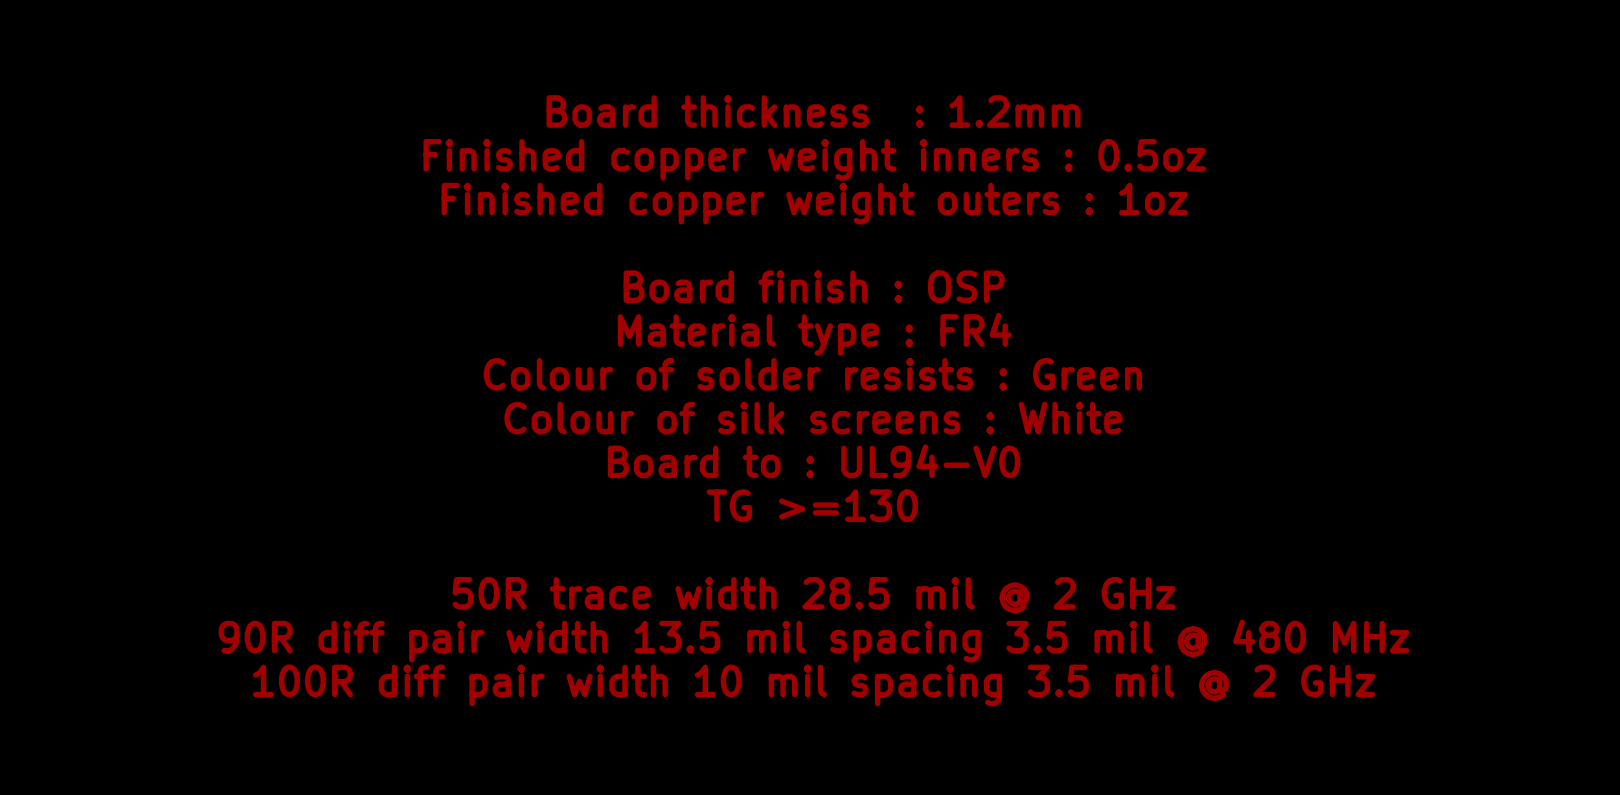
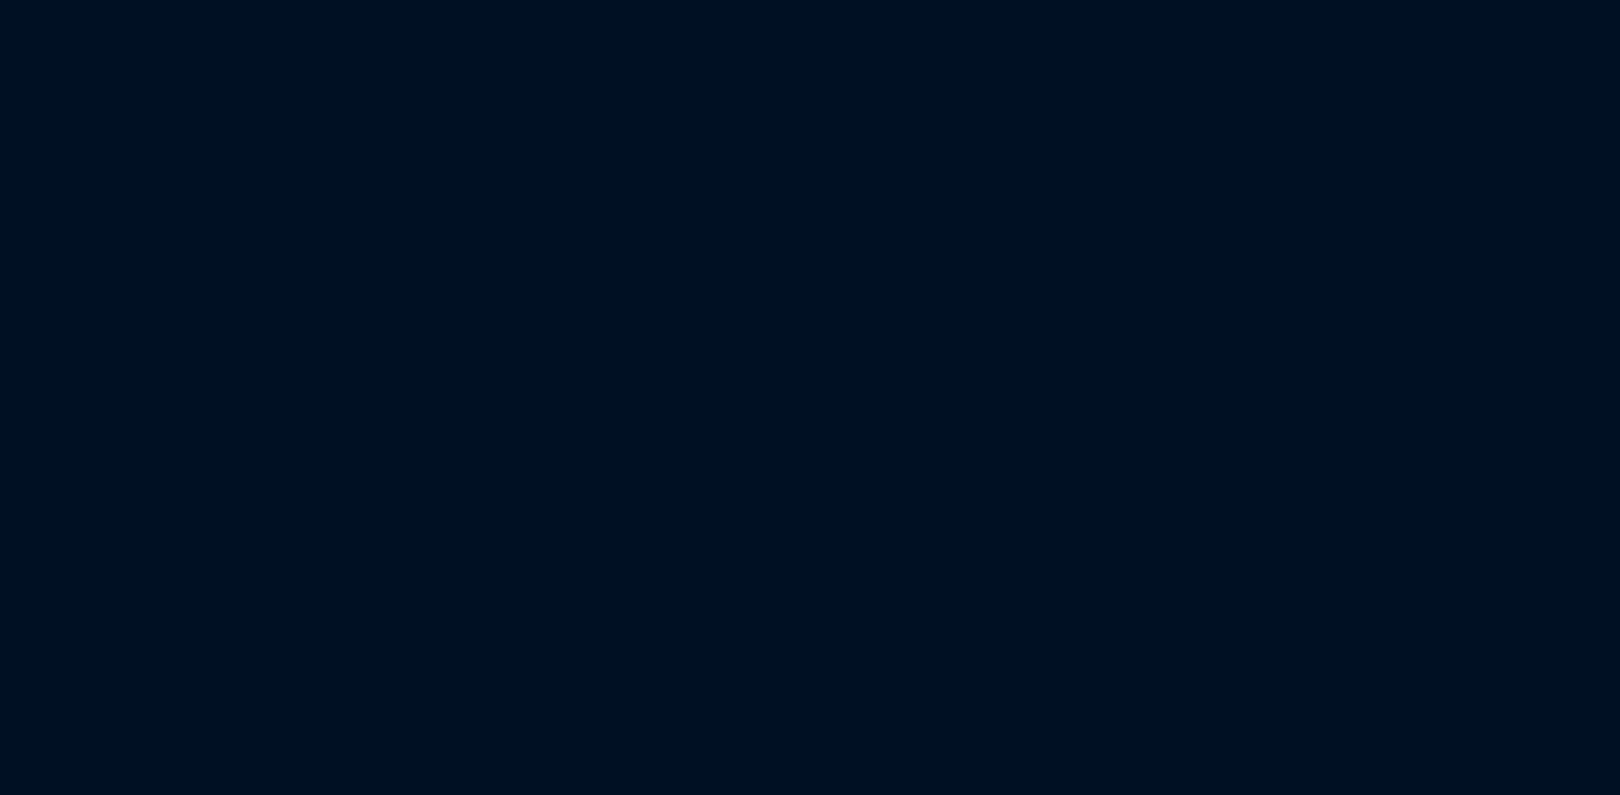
text: Board thickness : 1.2mm (813, 111) -> none
text: Finished copper weight inners : 0.5oz (814, 159) -> none
text: Finished copper weight outers : 1oz (814, 203) -> none
text: Board finish : OSP (814, 286) -> none
text: Material type : FR4 (814, 334) -> none
text: Colour of solder resists : Green (812, 374) -> none
text: Colour of silk screens : White (813, 418) -> none
text: Board to : UL94-V0 (814, 461) -> none
text: TG >=130 (812, 505) -> none
text: 50R trace width 28.5 mil @ 2 GHz (814, 595) -> none
text: 90R diff pair width 13.5 mil spacing 3.5 mil @ 480 MHz (814, 641) -> none
text: 100R diff pair width 10 mil spacing 3.5 mil @ 2 GHz (814, 685) -> none

